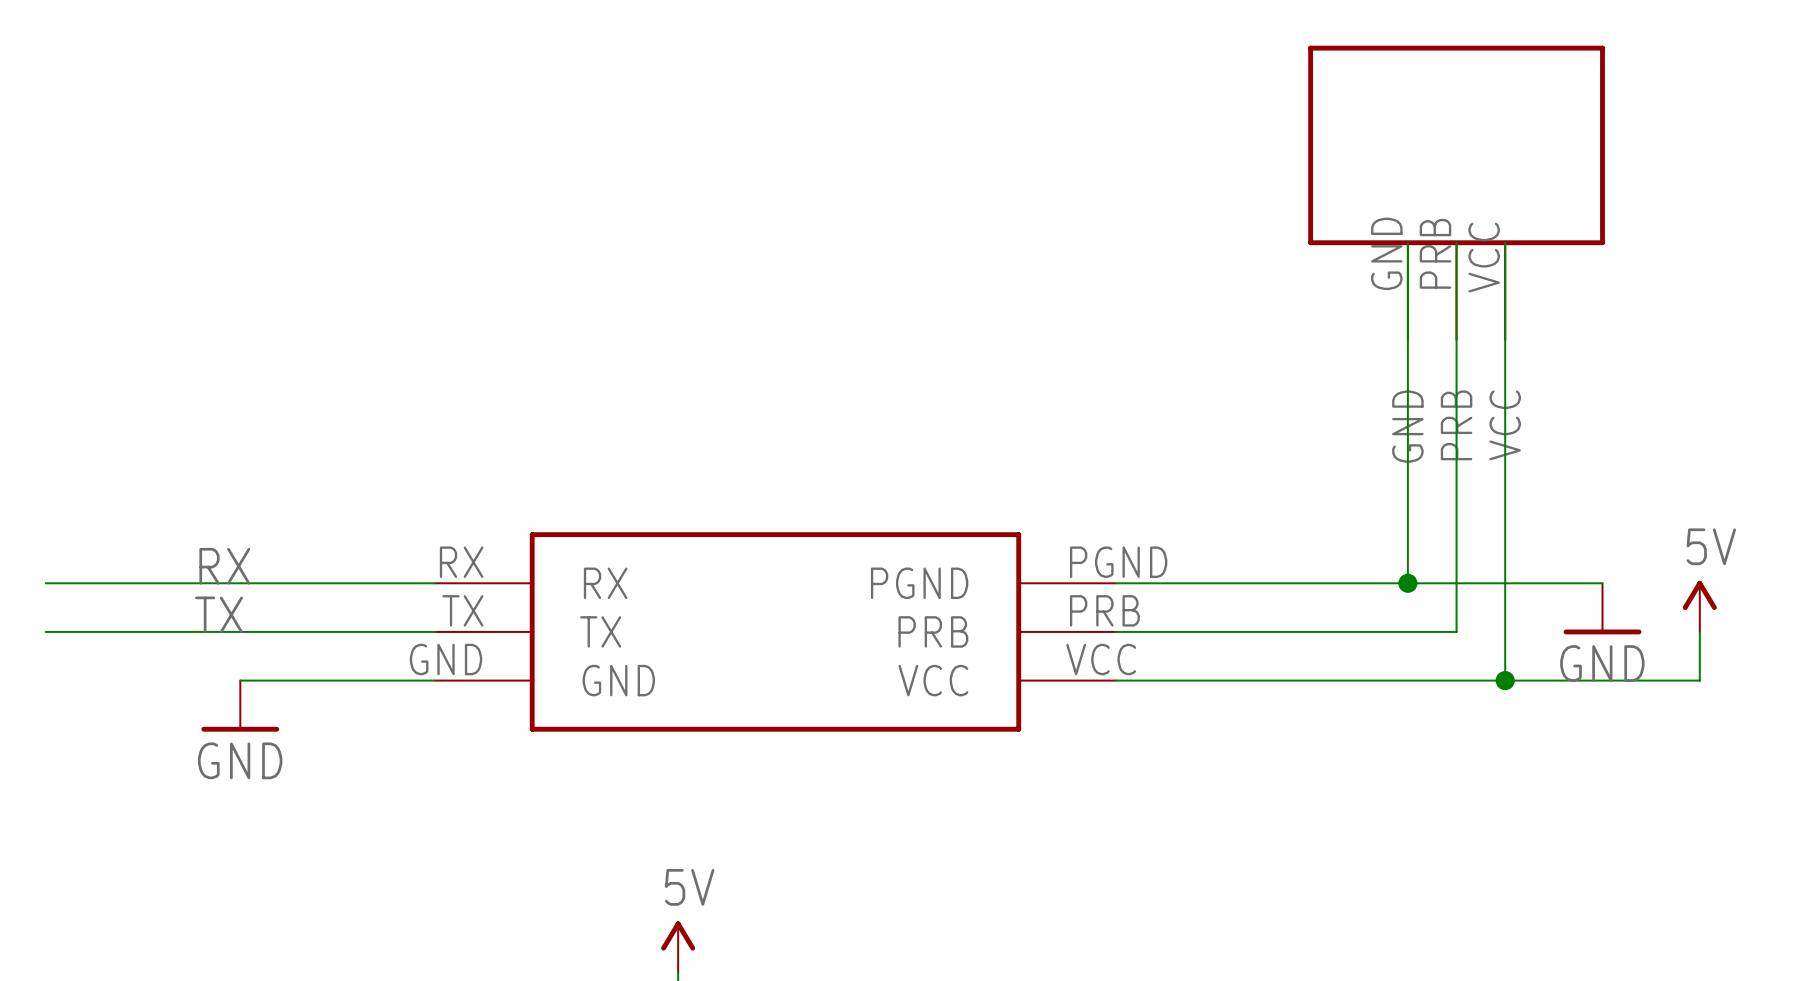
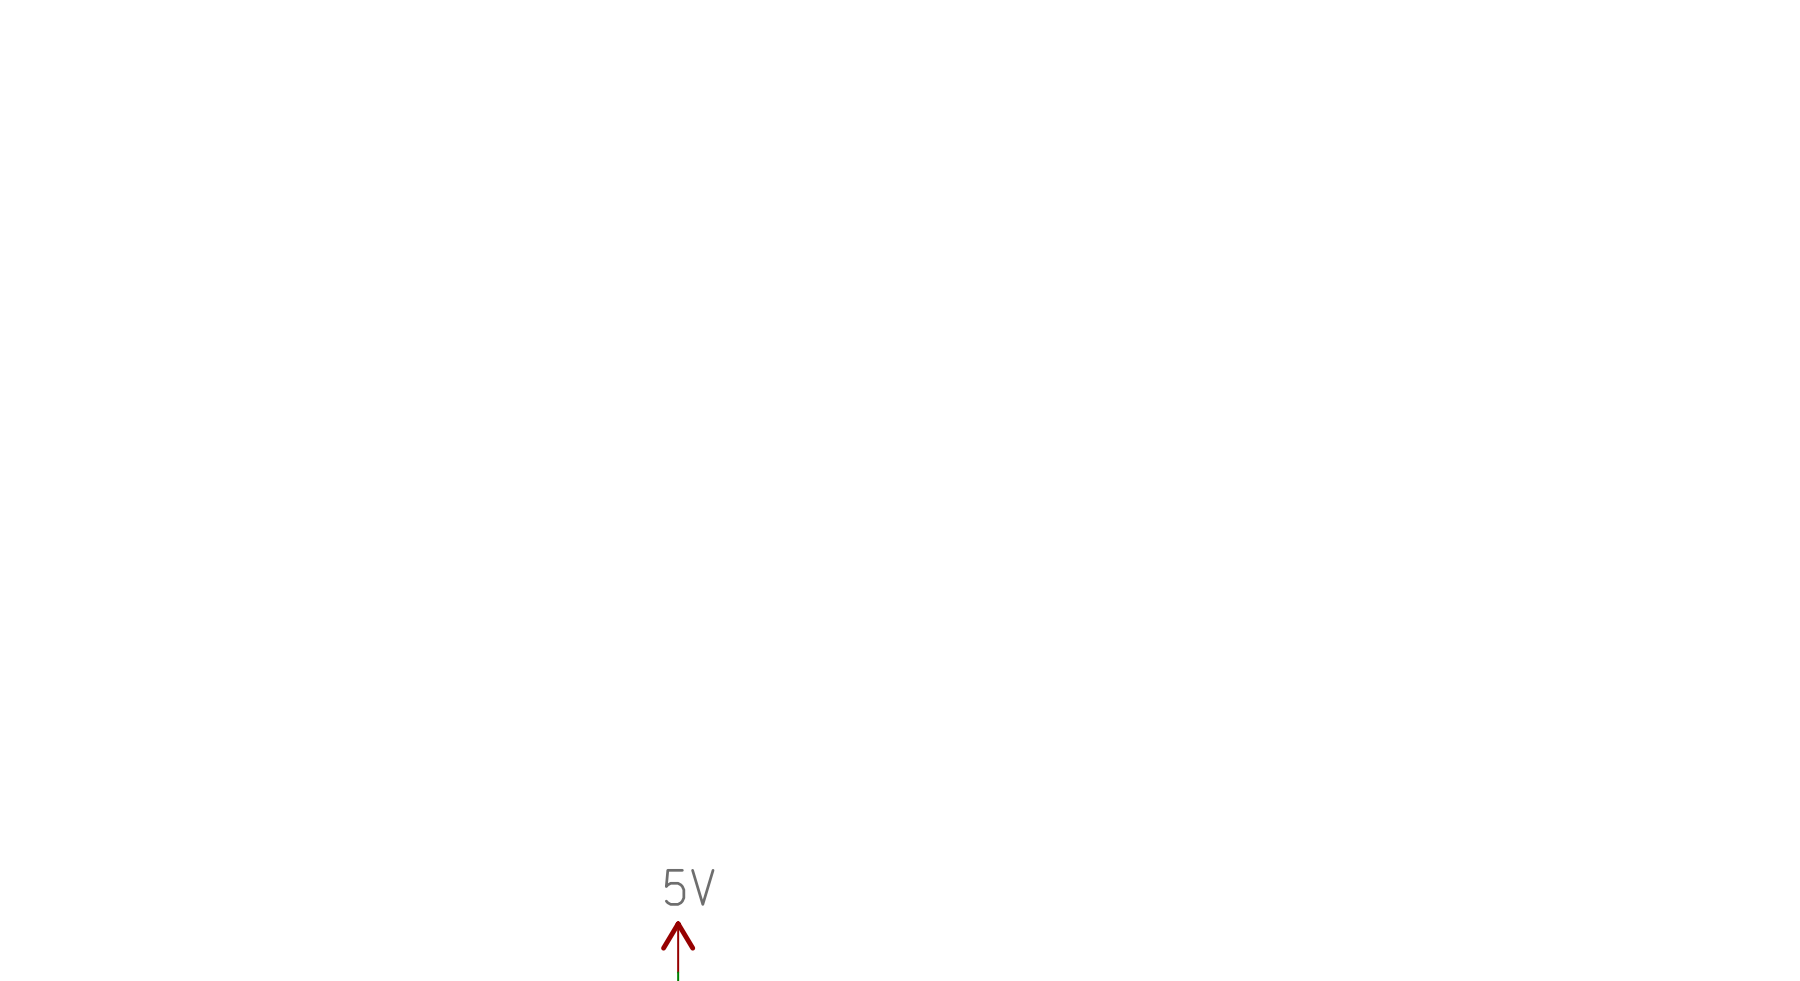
part: (1456, 192) -> none
wire: (1407, 242) (1407, 583) -> none
wire: (1456, 242) (1456, 631) (1116, 631) -> none
wire: (1505, 242) (1505, 680) -> none
label: RX (224, 566) -> none
wire: (45, 583) (434, 583) -> none
wire: (1116, 583) (1602, 583) -> none
junction: (1407, 583) -> none
power symbol: 5V (1699, 606) -> none
power symbol: GND (1602, 608) -> none
label: TX (218, 614) -> none
wire: (45, 631) (434, 631) -> none
part: (775, 631) -> none
wire: (1699, 631) (1699, 680) (1116, 680) -> none
wire: (240, 680) (434, 680) -> none
junction: (1505, 680) -> none
power symbol: GND (240, 706) -> none

